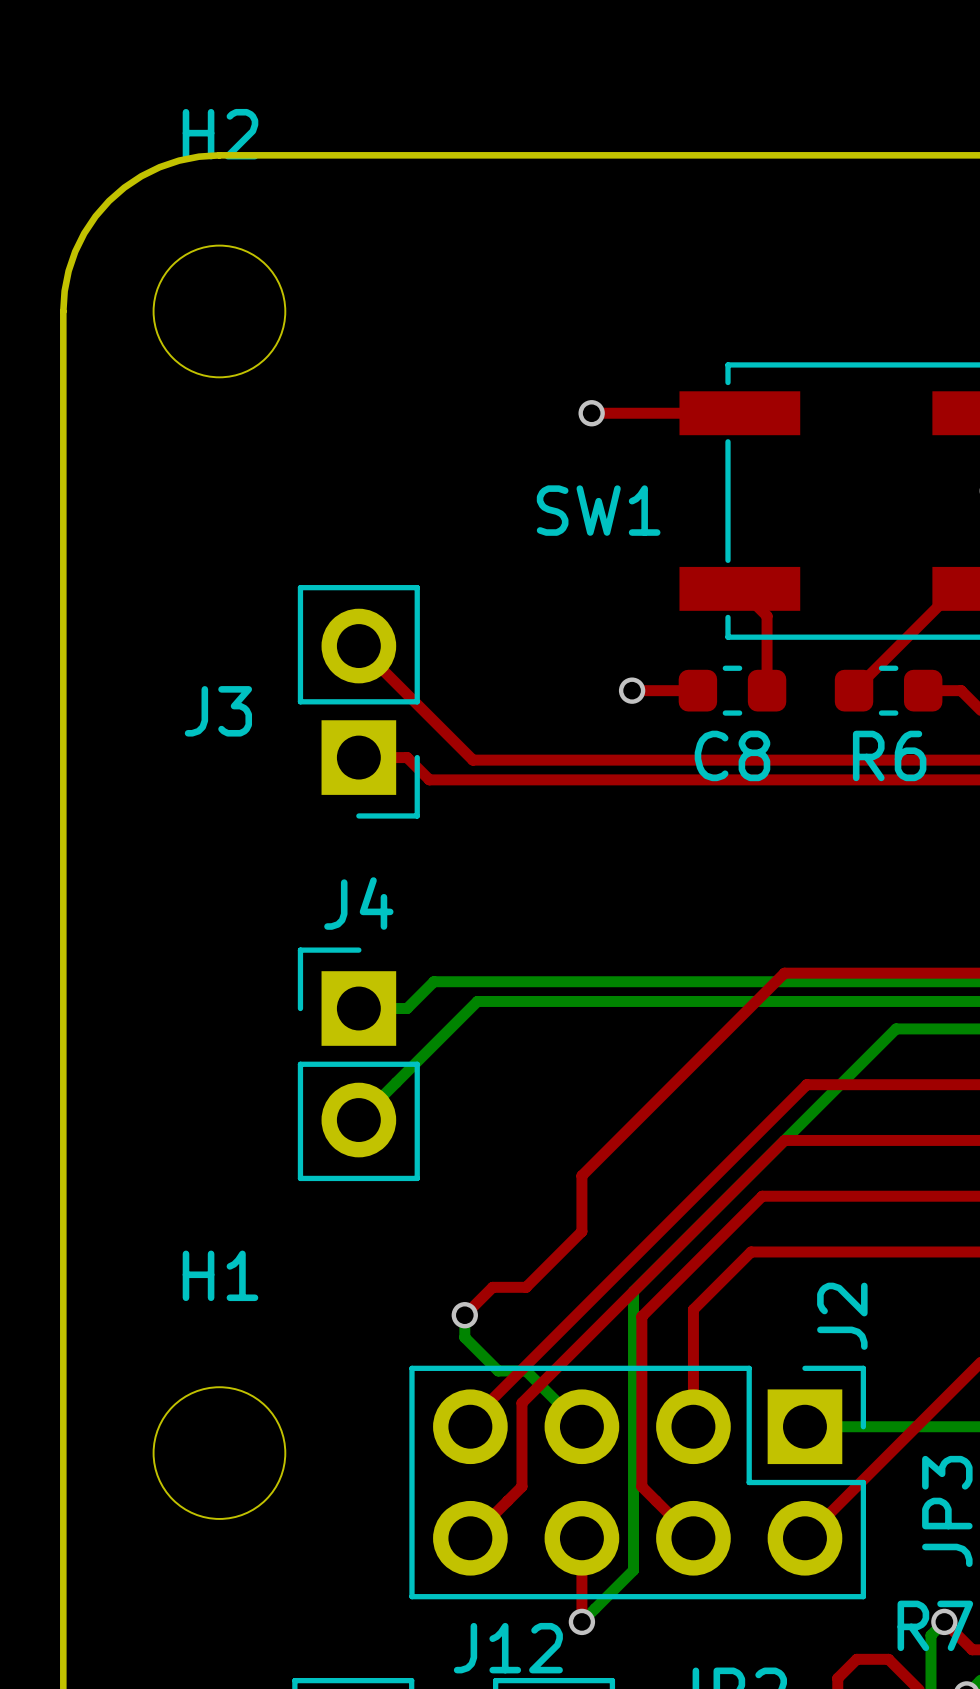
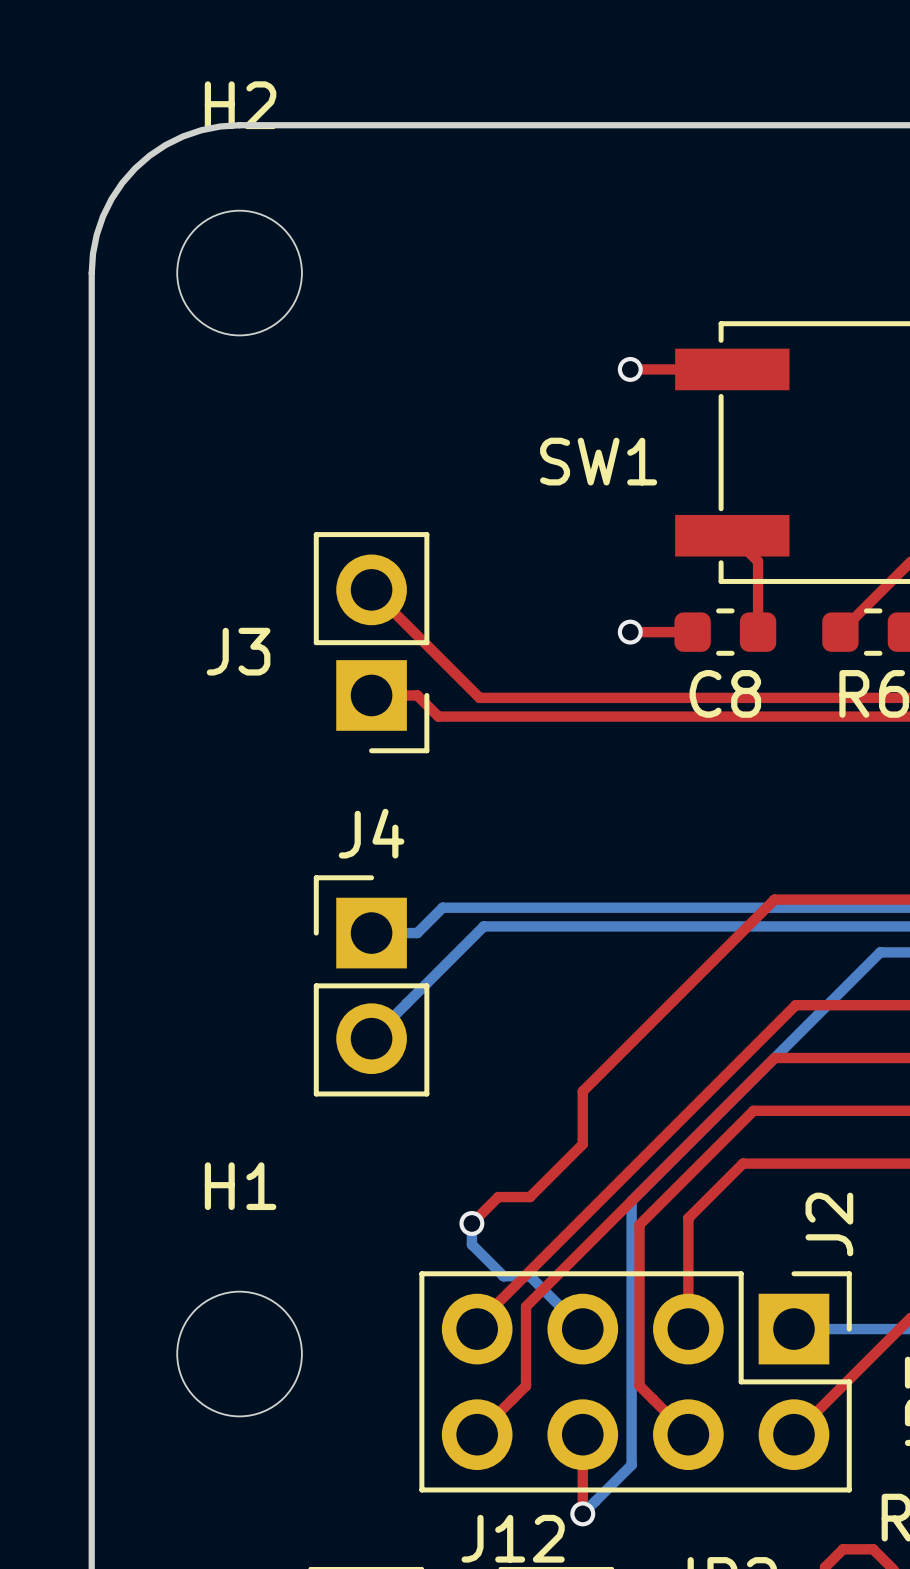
top track: (591, 413) (632, 413) -> none
via position: (591, 413) -> (630, 369)

